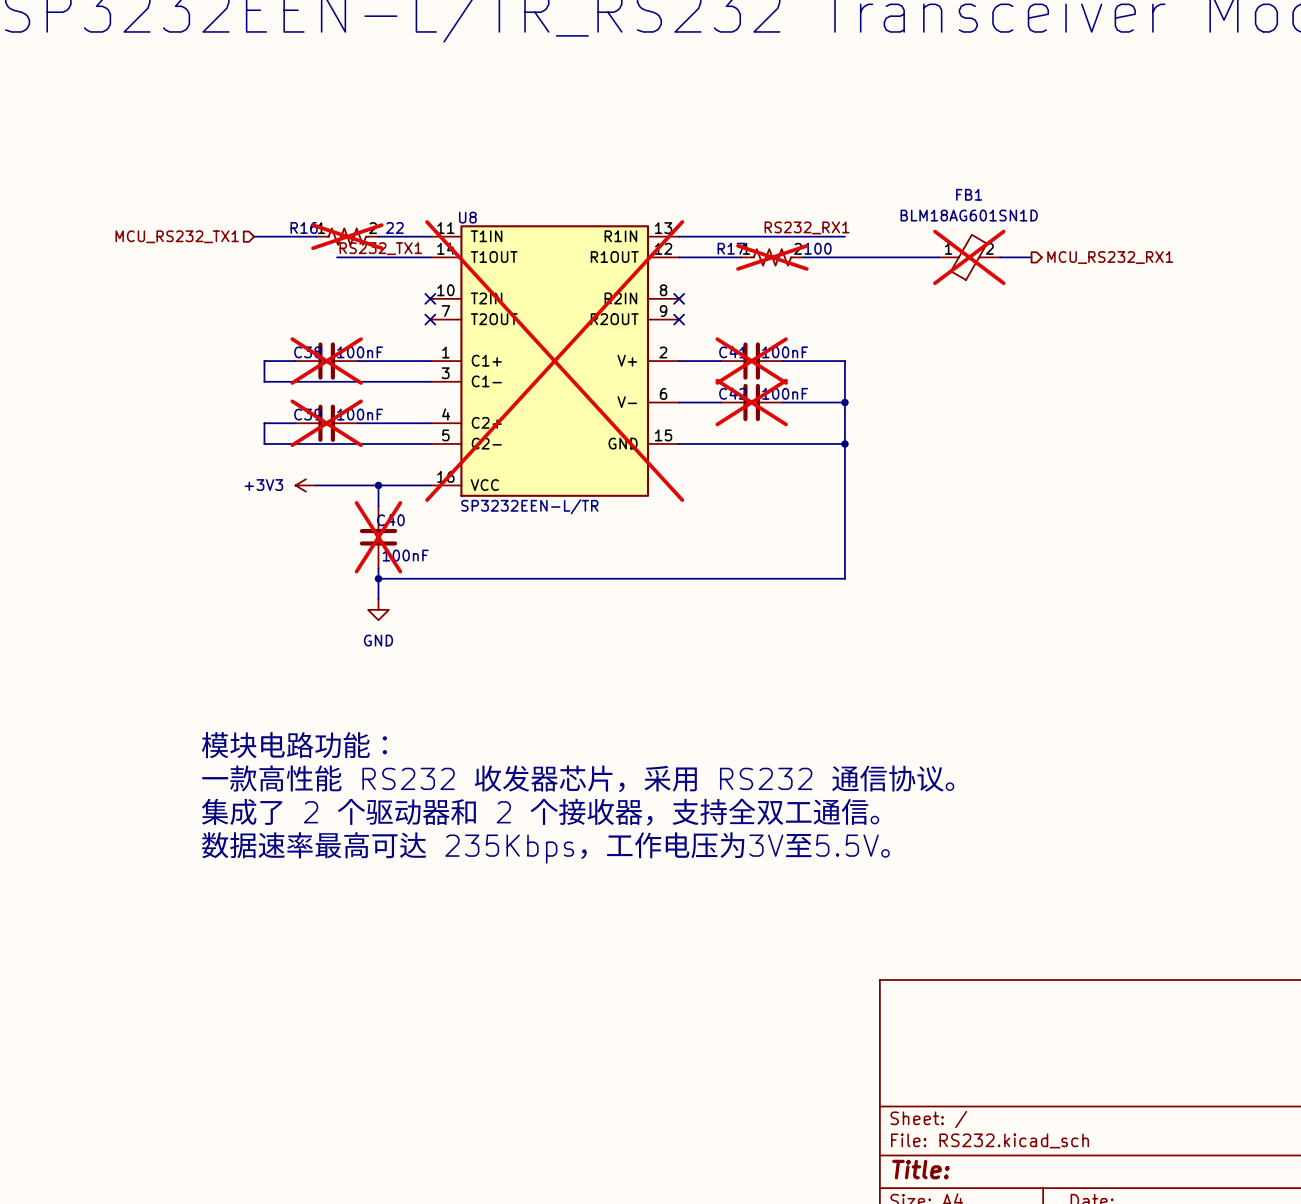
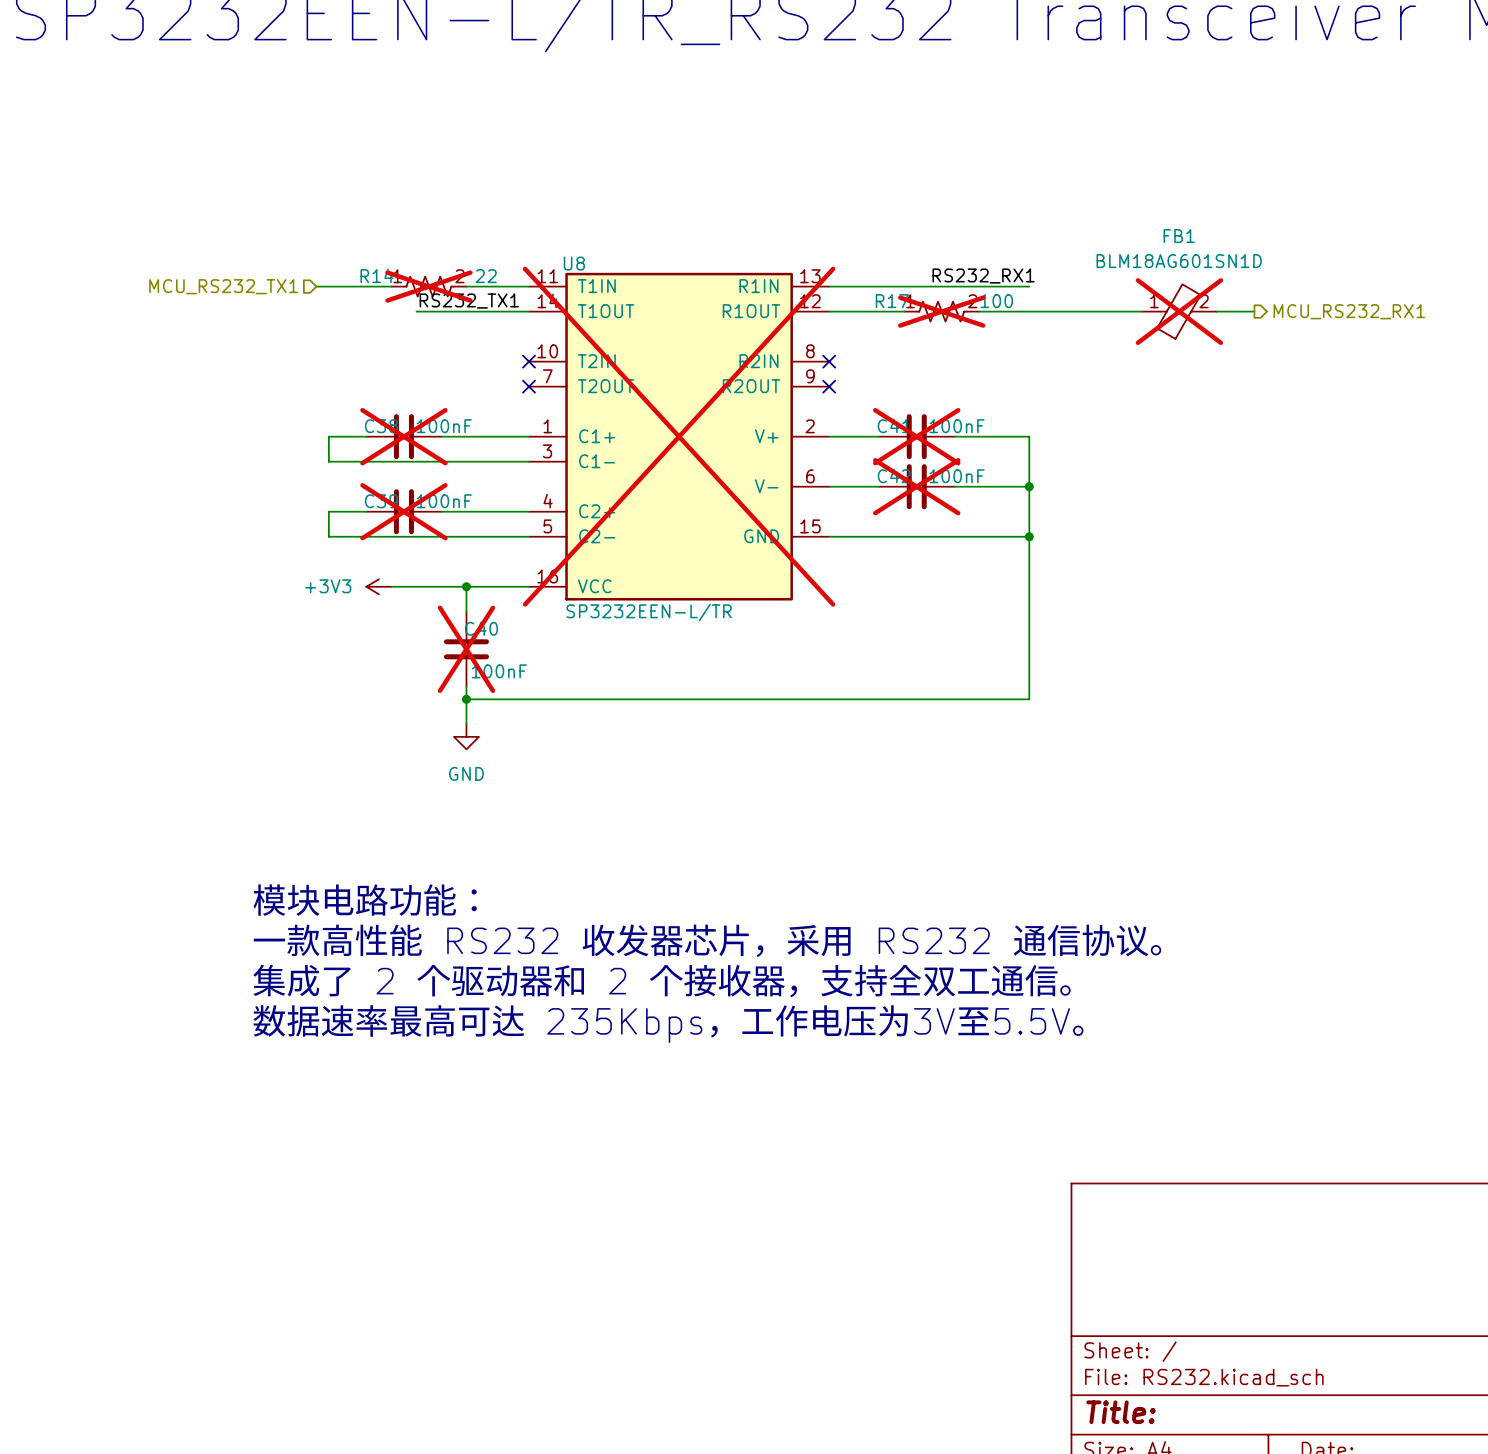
R16 name: R16 (304, 227) -> R14 (377, 275)

